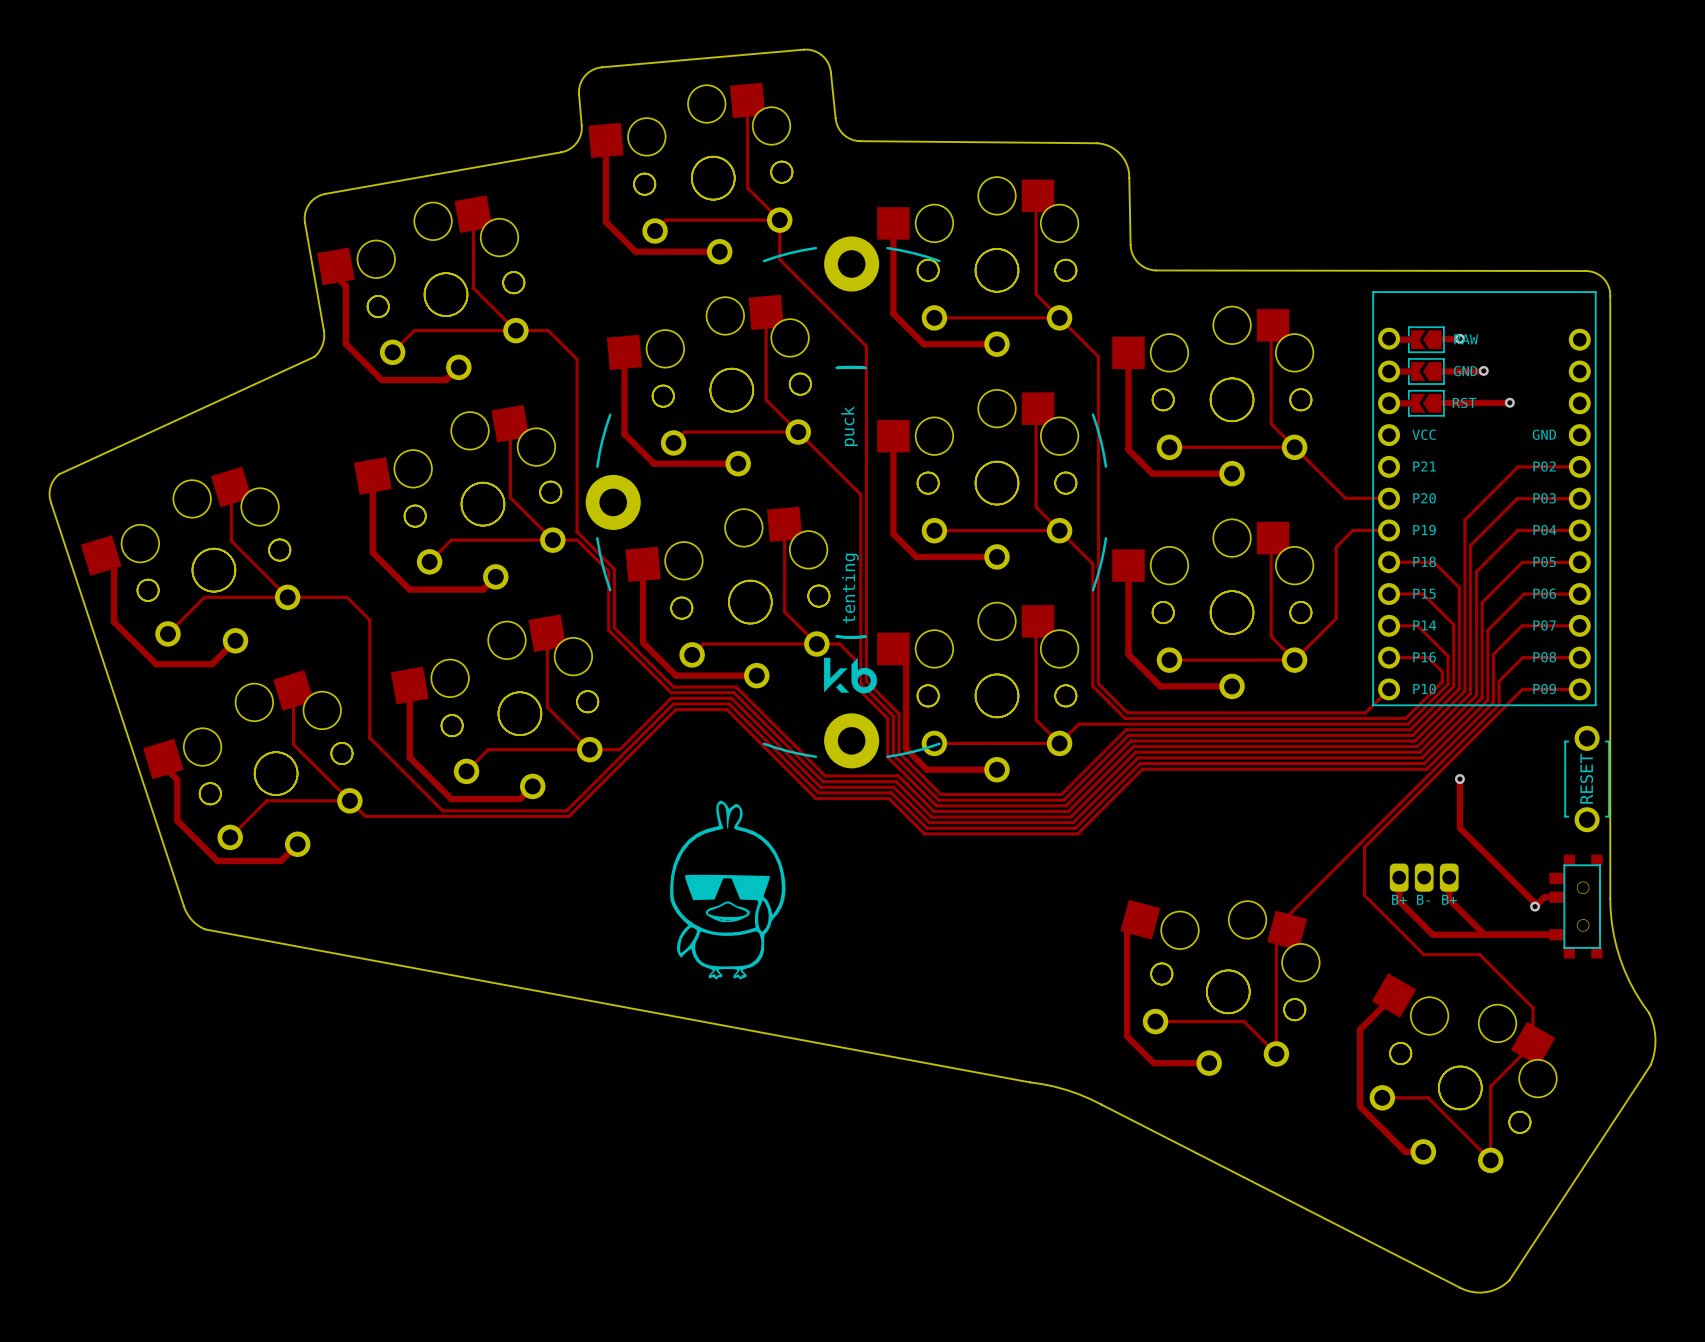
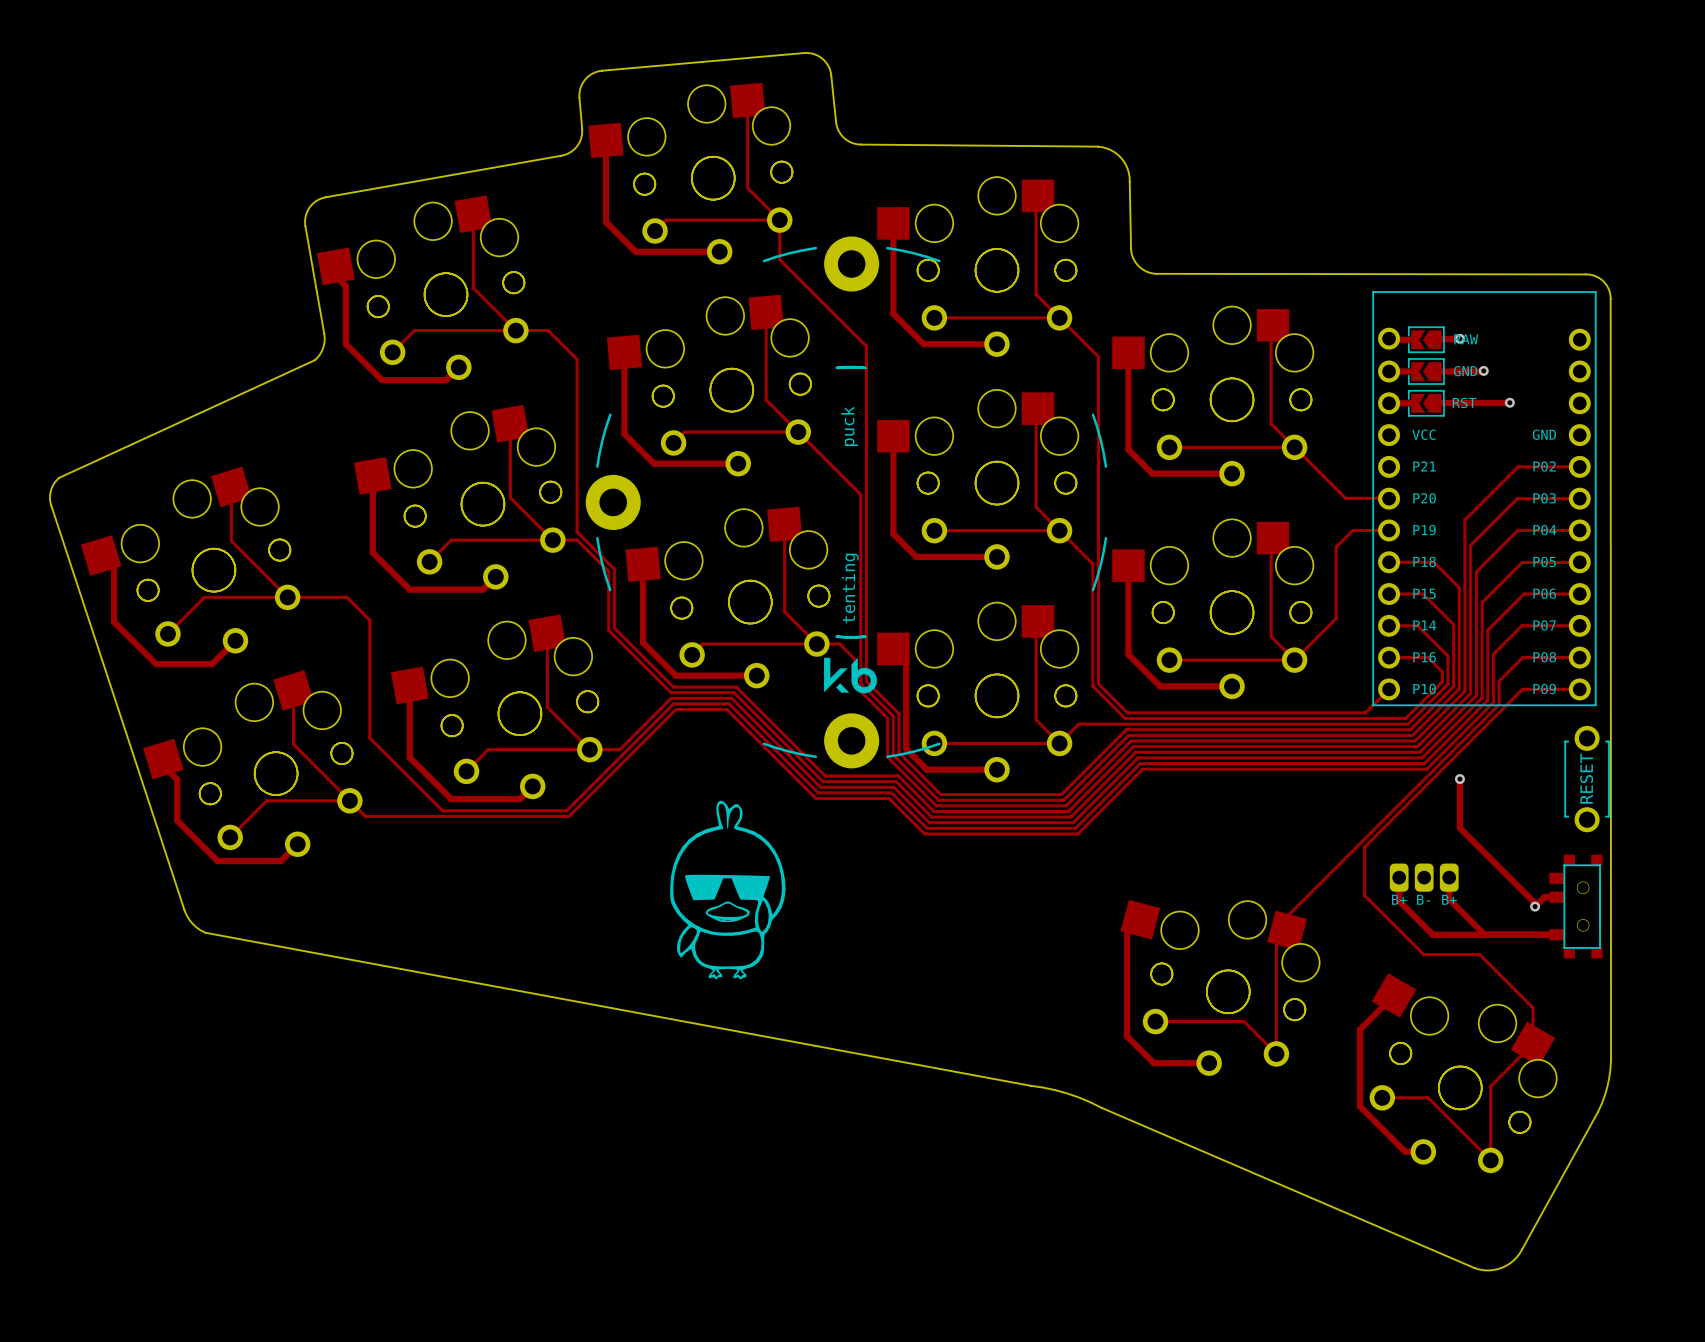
board edge: (803, 49) (595, 68) (587, 73) (580, 84) (581, 131) (576, 142) (567, 150) (325, 193) (316, 197) (307, 207) (304, 219) (324, 334) (322, 344) (317, 354) (58, 474) (54, 478) (49, 490) (50, 502) (187, 913) (194, 923) (205, 929) (1066, 1090) (1101, 1104) (1464, 1289) (1480, 1292) (1500, 1286) (1509, 1280) (1650, 1065) (1655, 1045) (1651, 1019) (1629, 981) (1620, 959) (1613, 935) (1610, 910) (1610, 295) (1606, 282) (1598, 274) (1588, 271) (1149, 269) (1138, 262) (1131, 251) (1128, 169) (1123, 157) (1113, 148) (1097, 143) (860, 141) (851, 139) (843, 134) (836, 124) (830, 69) (827, 61) (817, 52) (803, 49) -> (804, 53) (595, 72) (587, 77) (580, 88) (581, 135) (577, 146) (567, 153) (317, 200) (309, 207) (305, 220) (324, 337) (323, 348) (317, 357) (59, 477) (55, 482) (50, 493) (51, 505) (187, 917) (195, 926) (205, 932) (1055, 1090) (1090, 1102) (1474, 1268) (1488, 1270) (1506, 1265) (1519, 1253) (1598, 1111) (1607, 1086) (1610, 1068) (1610, 299) (1607, 285) (1599, 277) (1588, 274) (1149, 272) (1138, 266) (1132, 254) (1128, 172) (1123, 161) (1114, 152) (1097, 146) (860, 144) (851, 142) (841, 135) (837, 127) (830, 73) (827, 65) (817, 55) (804, 53)

